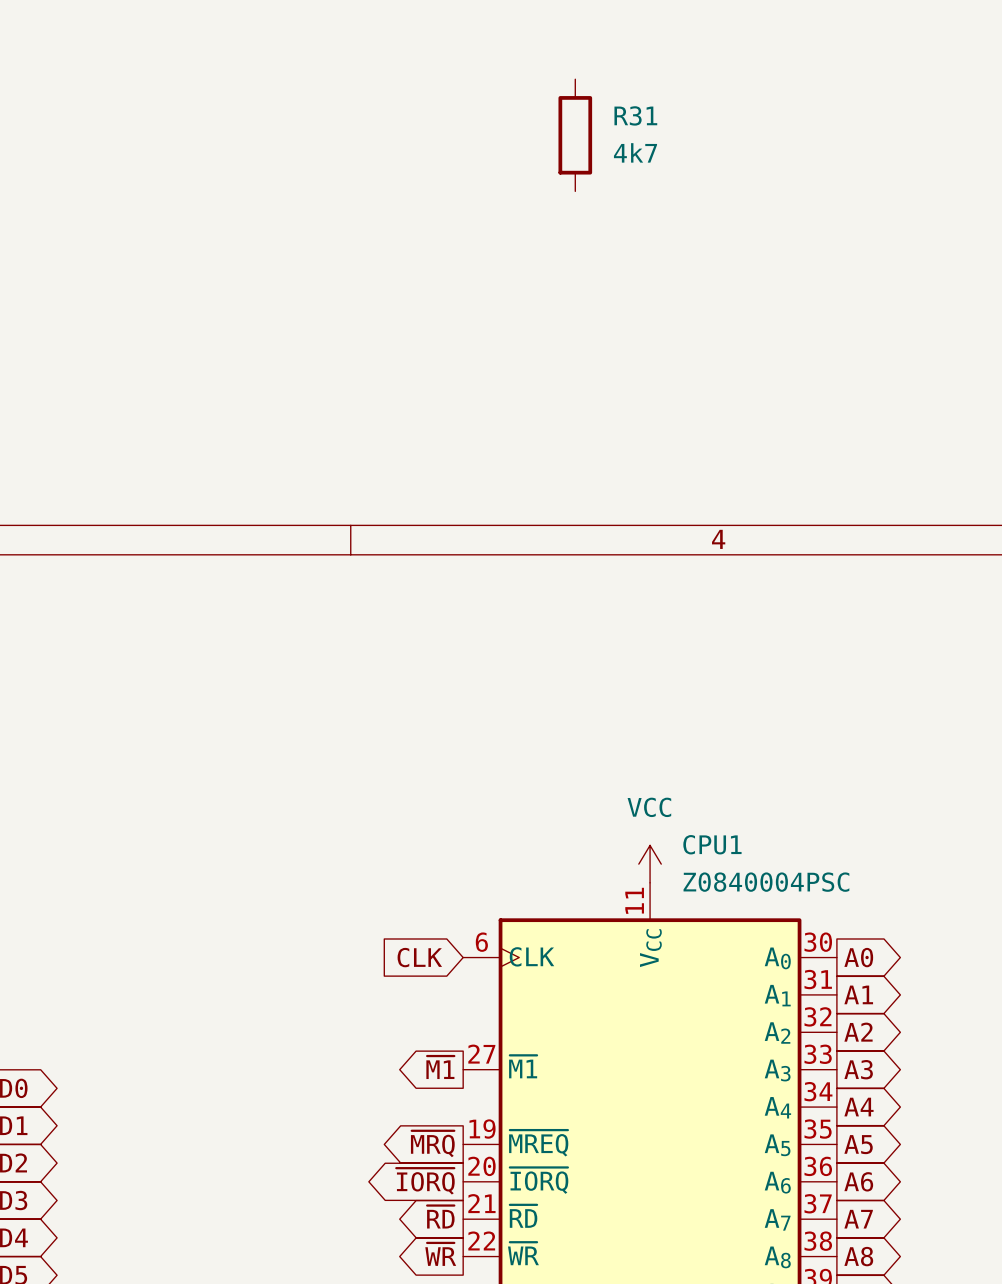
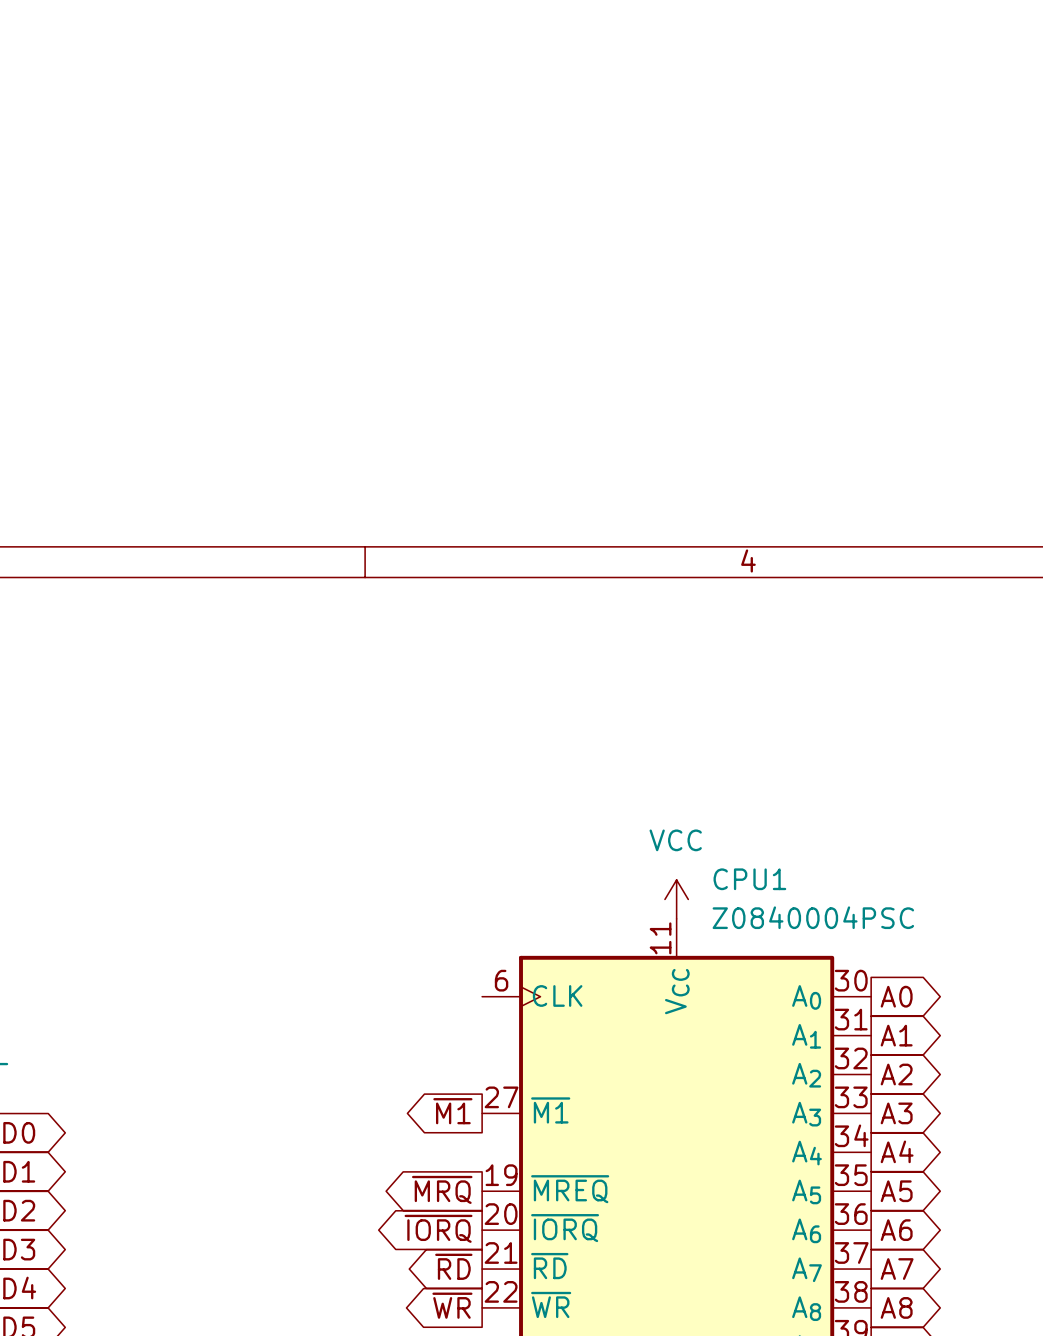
R31: 4k7 (575, 135) -> none
global label: CLK (419, 957) -> none

